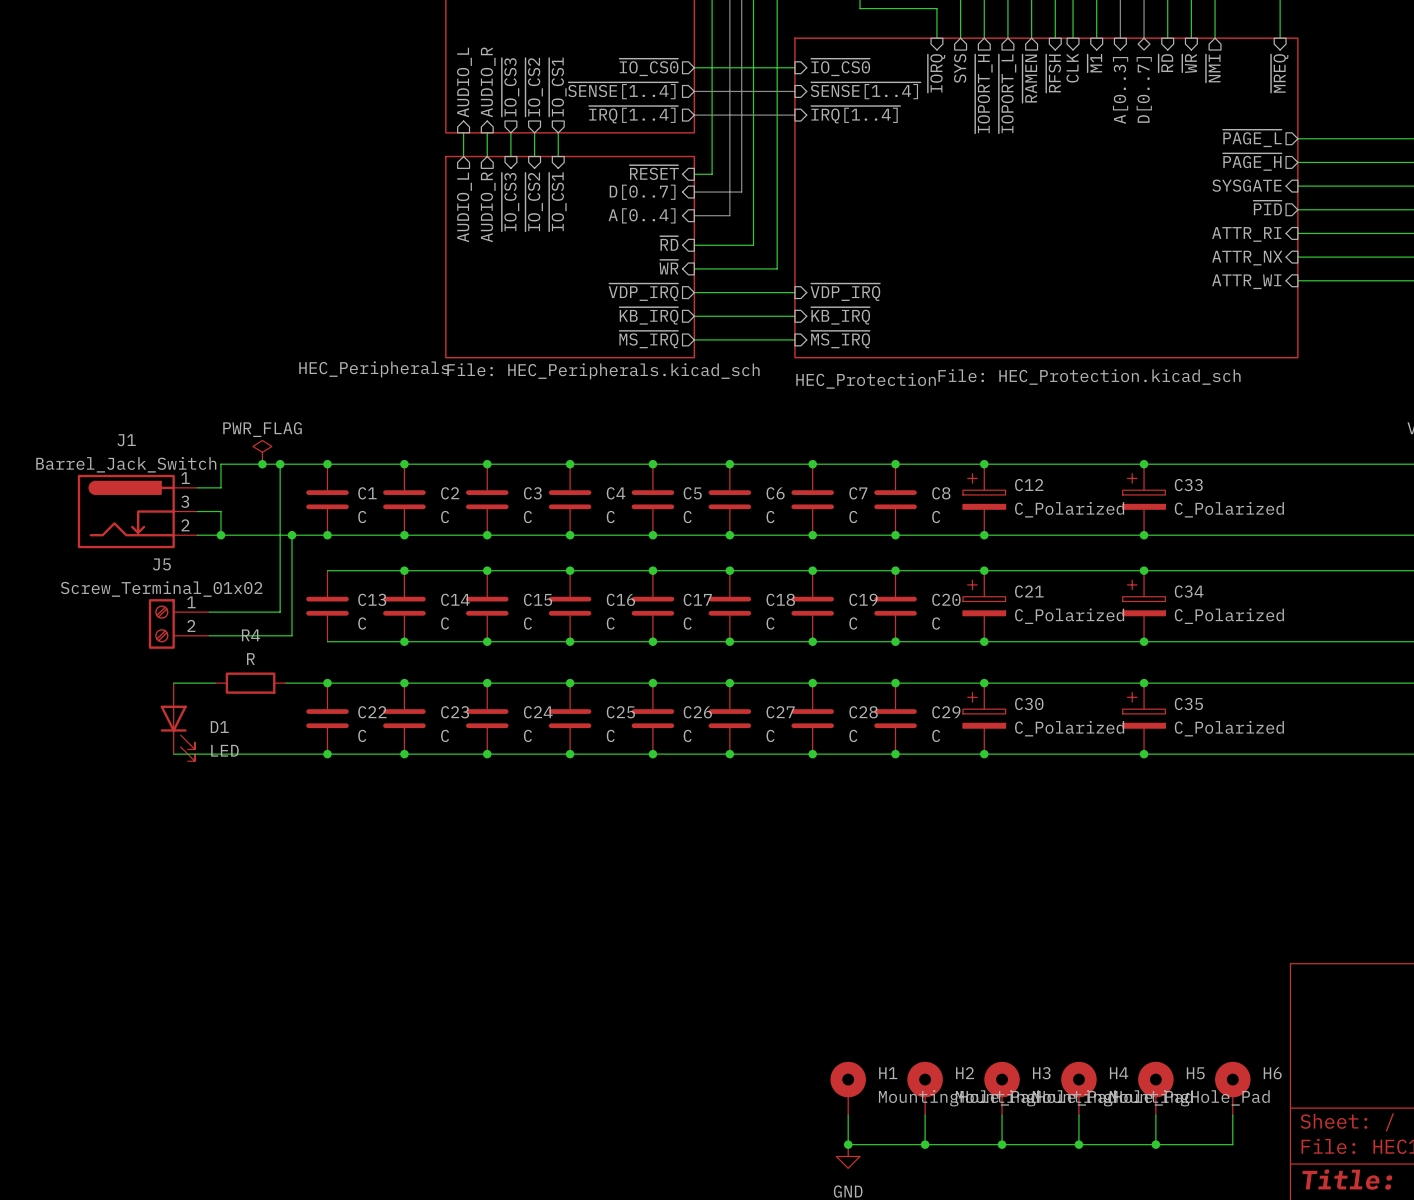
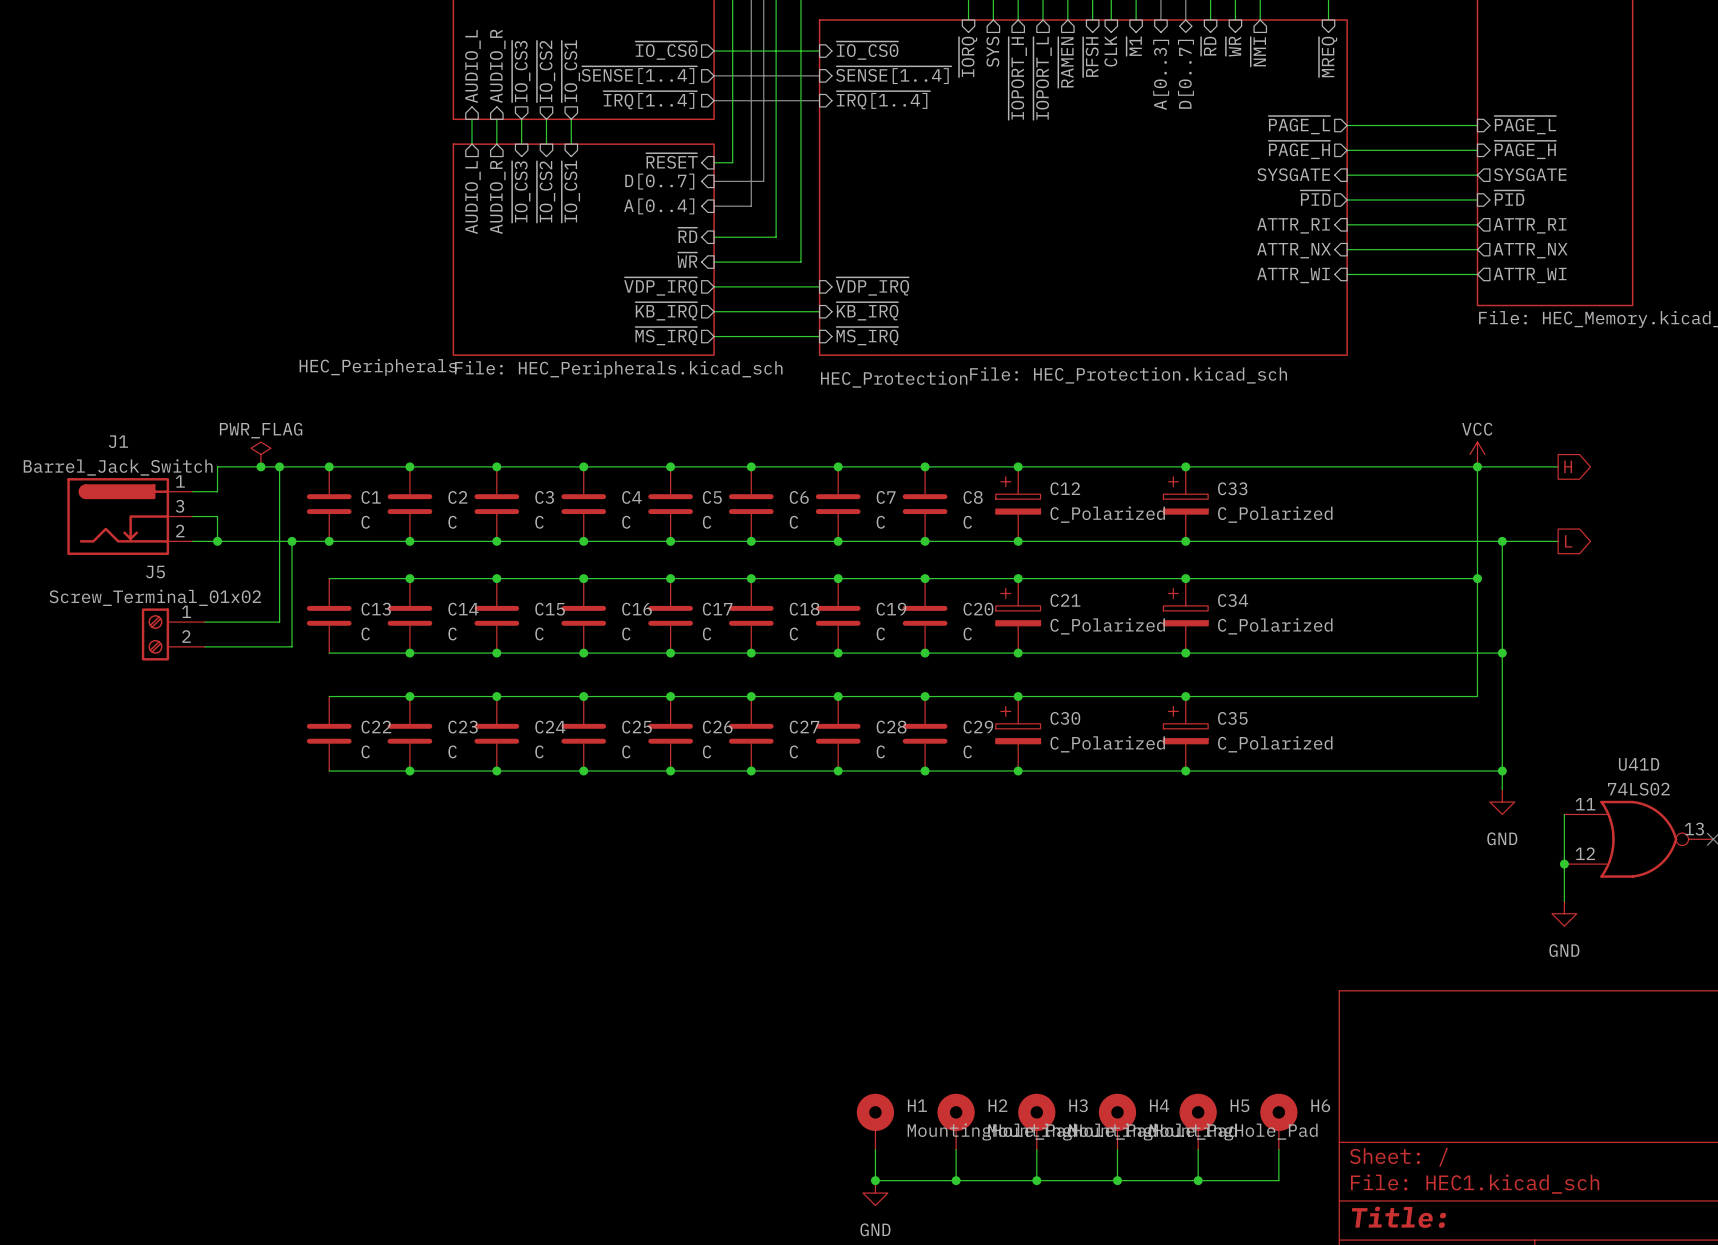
wire: (173, 683) (215, 683) -> none
R4: R (250, 683) -> none
wire: (286, 683) (327, 683) -> none
junction: (327, 683) -> none
D1: LED (177, 722) -> none
wire: (173, 754) (327, 754) -> none
junction: (327, 754) -> none

